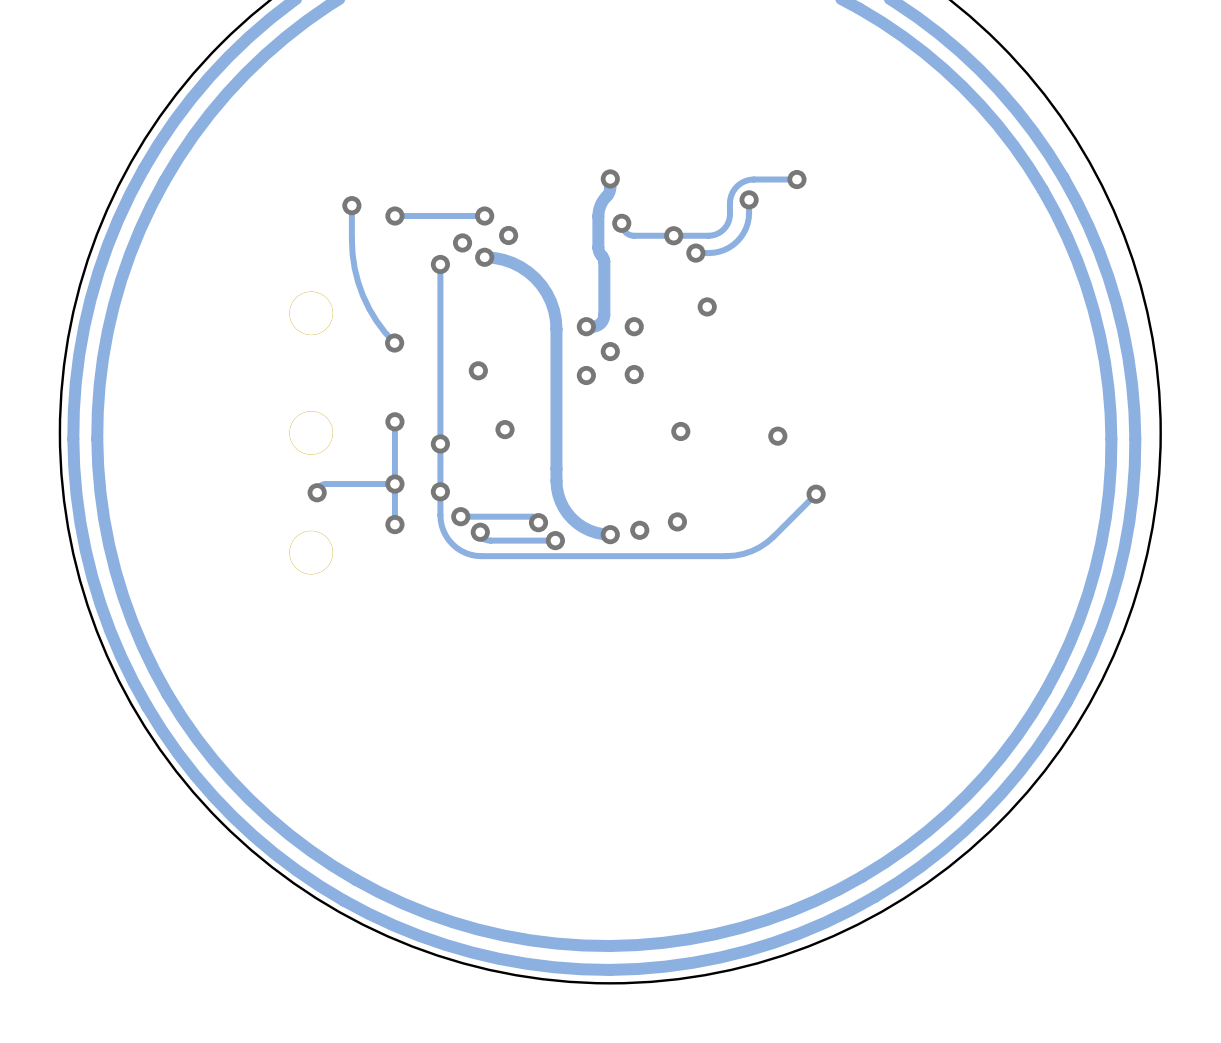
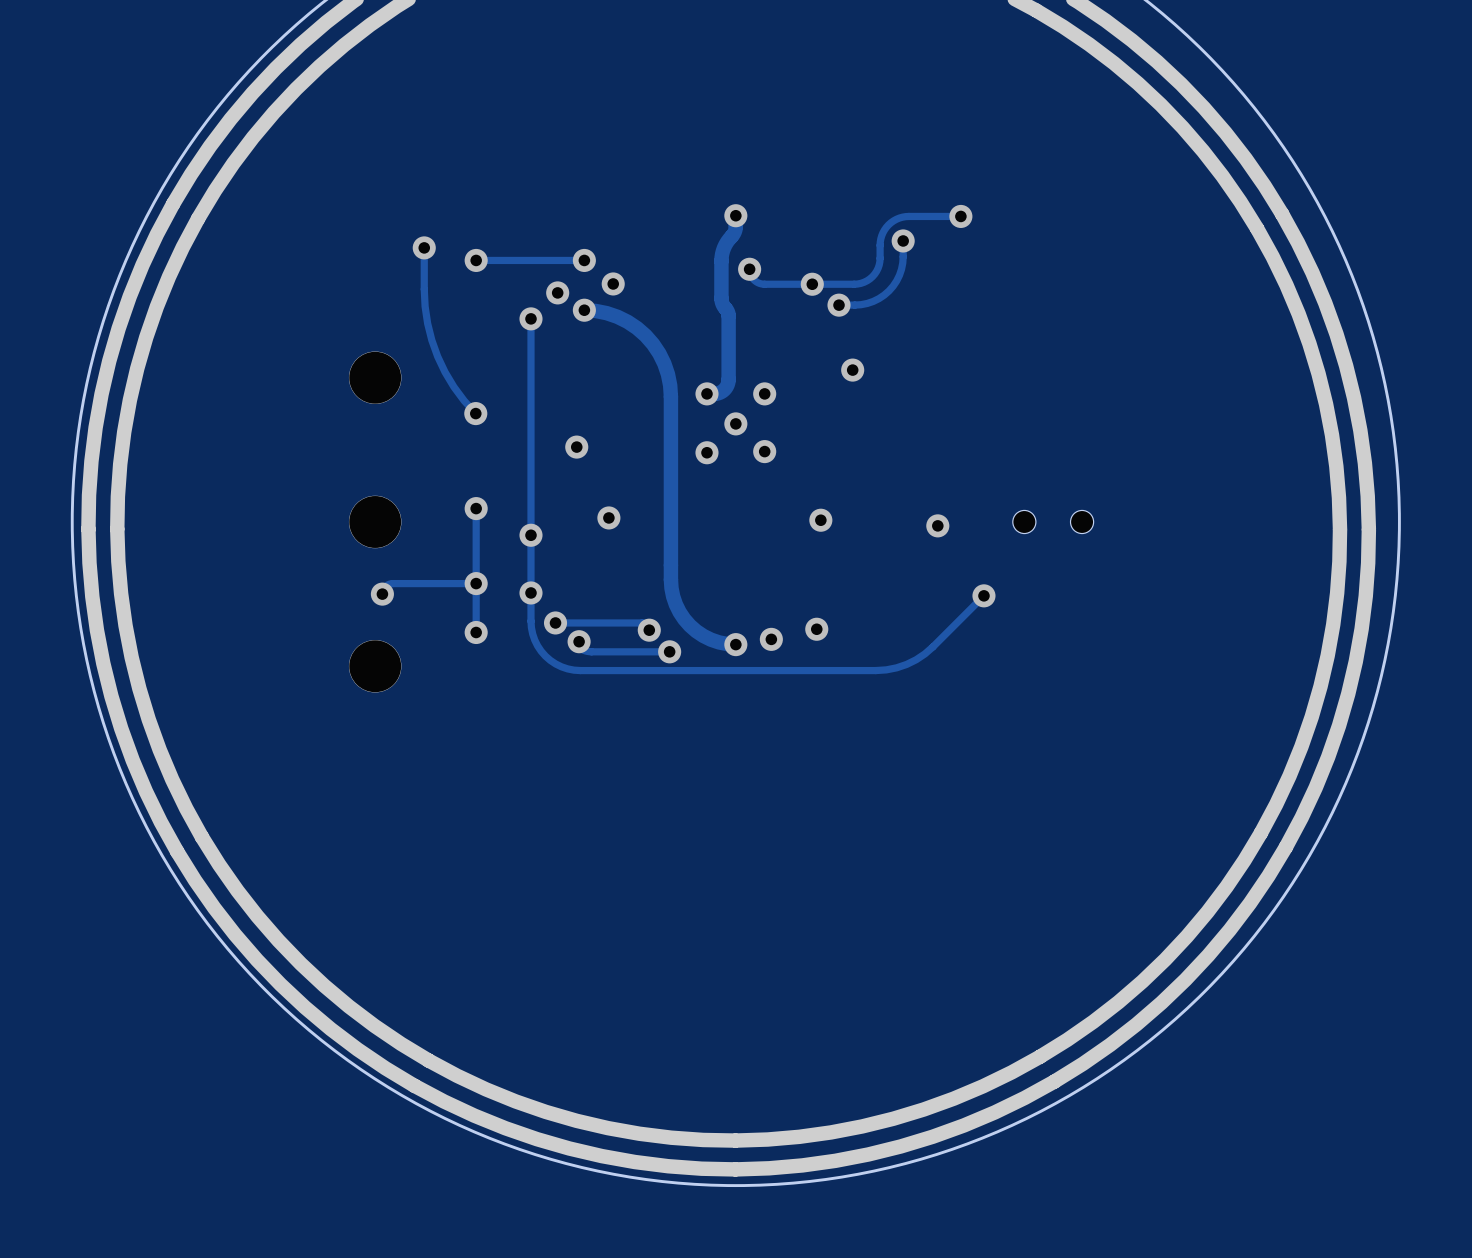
part: none -> (1053, 521)

